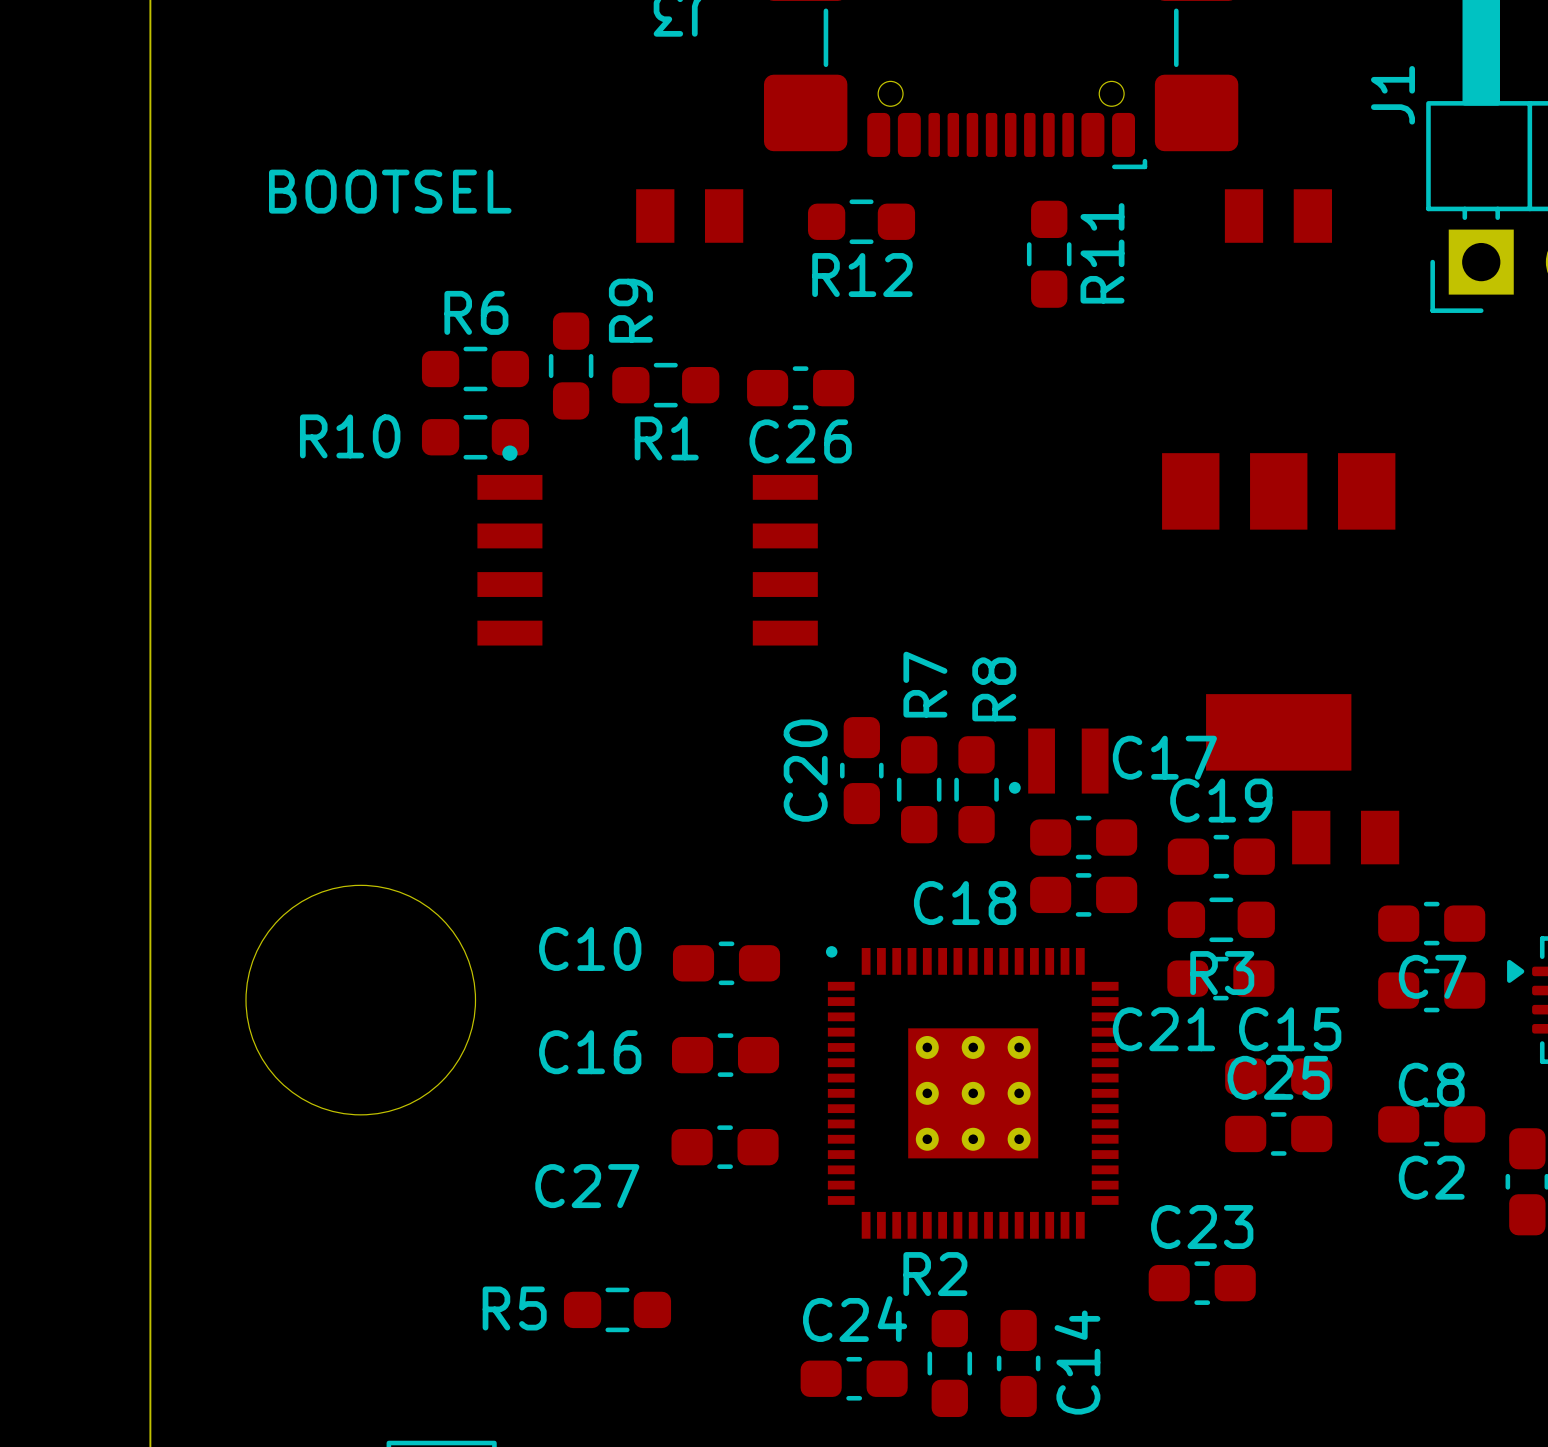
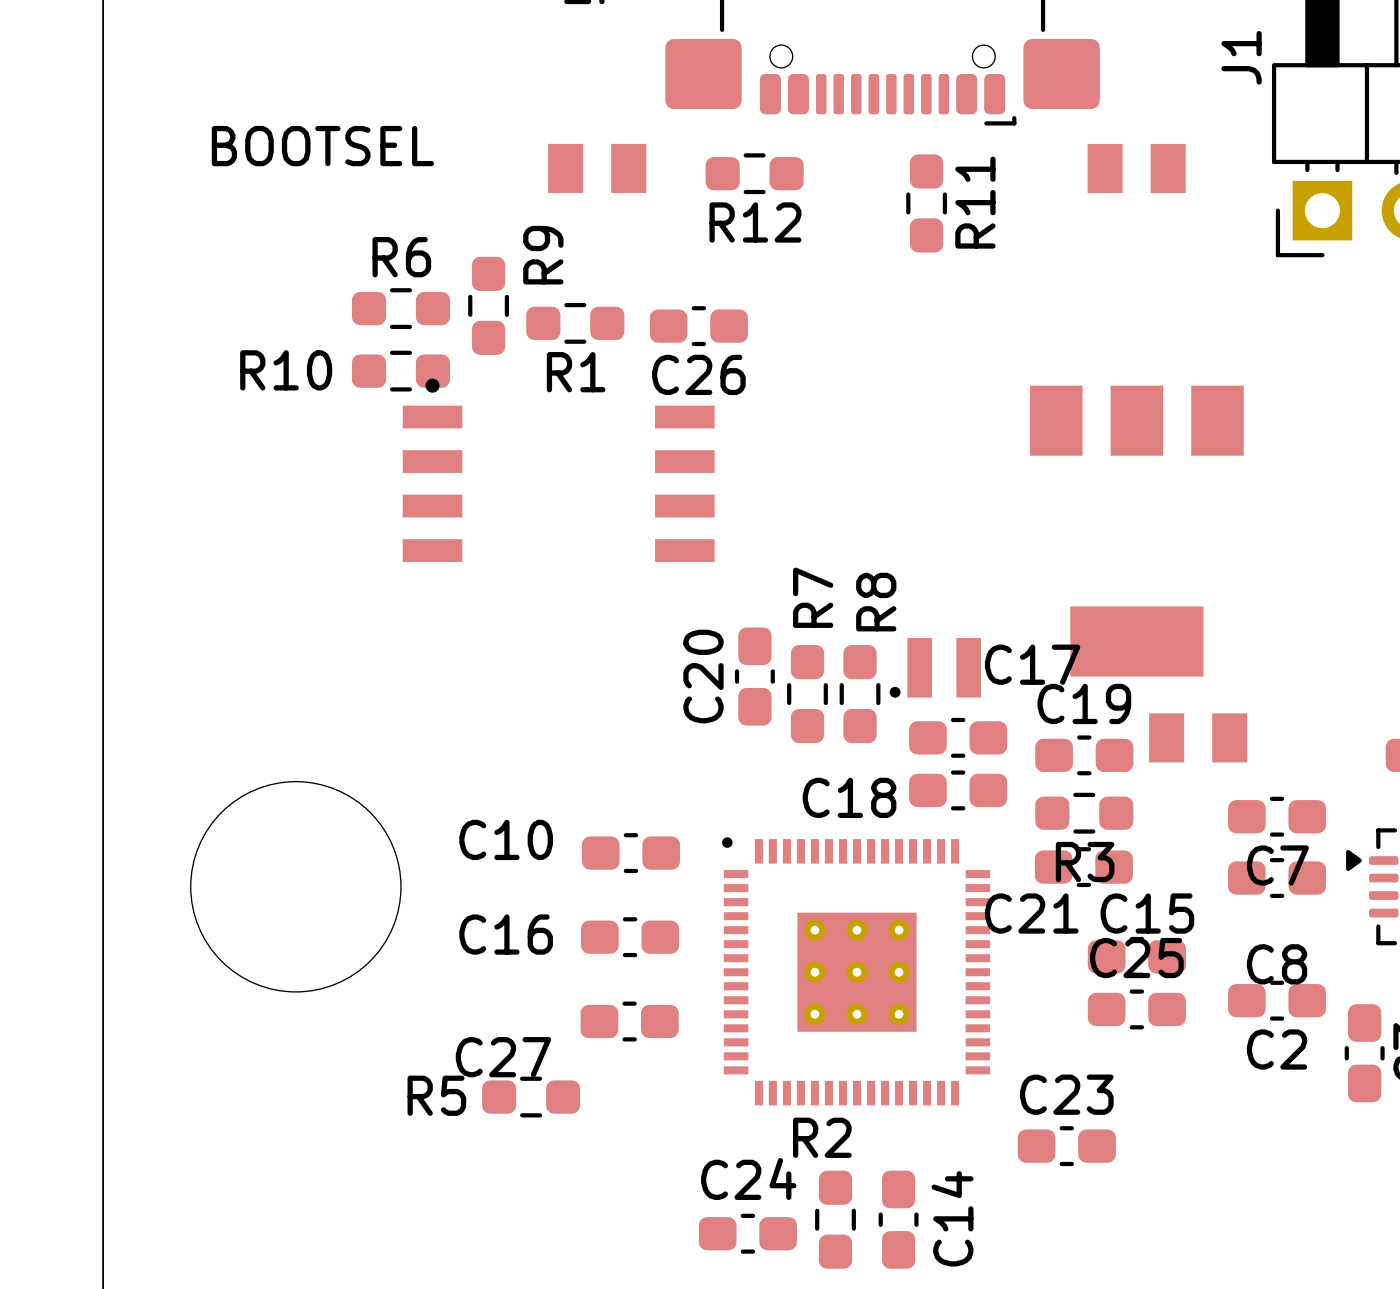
R5 position: (617, 1309) -> (531, 1097)

